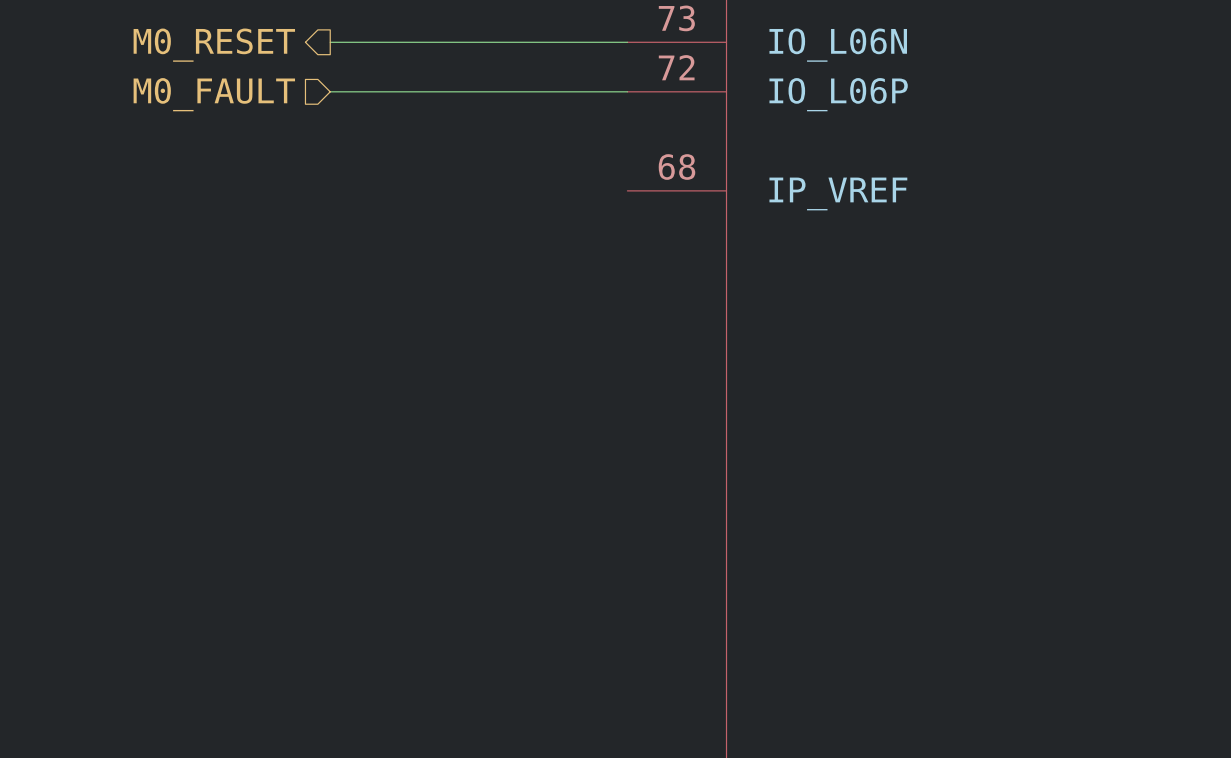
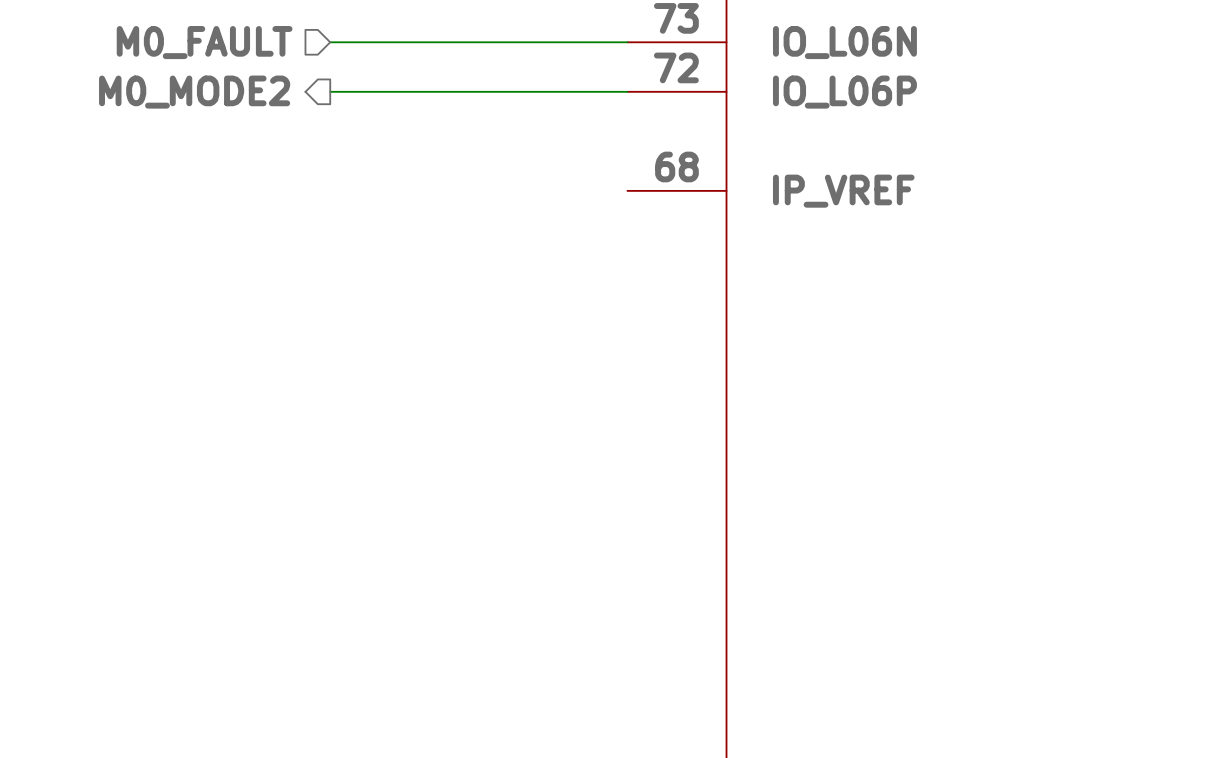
hierarchical label shape: output (214, 45) -> input (204, 42)
hierarchical label: M0_RESET (214, 45) -> M0_FAULT (204, 42)
hierarchical label shape: input (214, 94) -> output (194, 92)
hierarchical label: M0_FAULT (214, 94) -> M0_MODE2 (194, 92)

